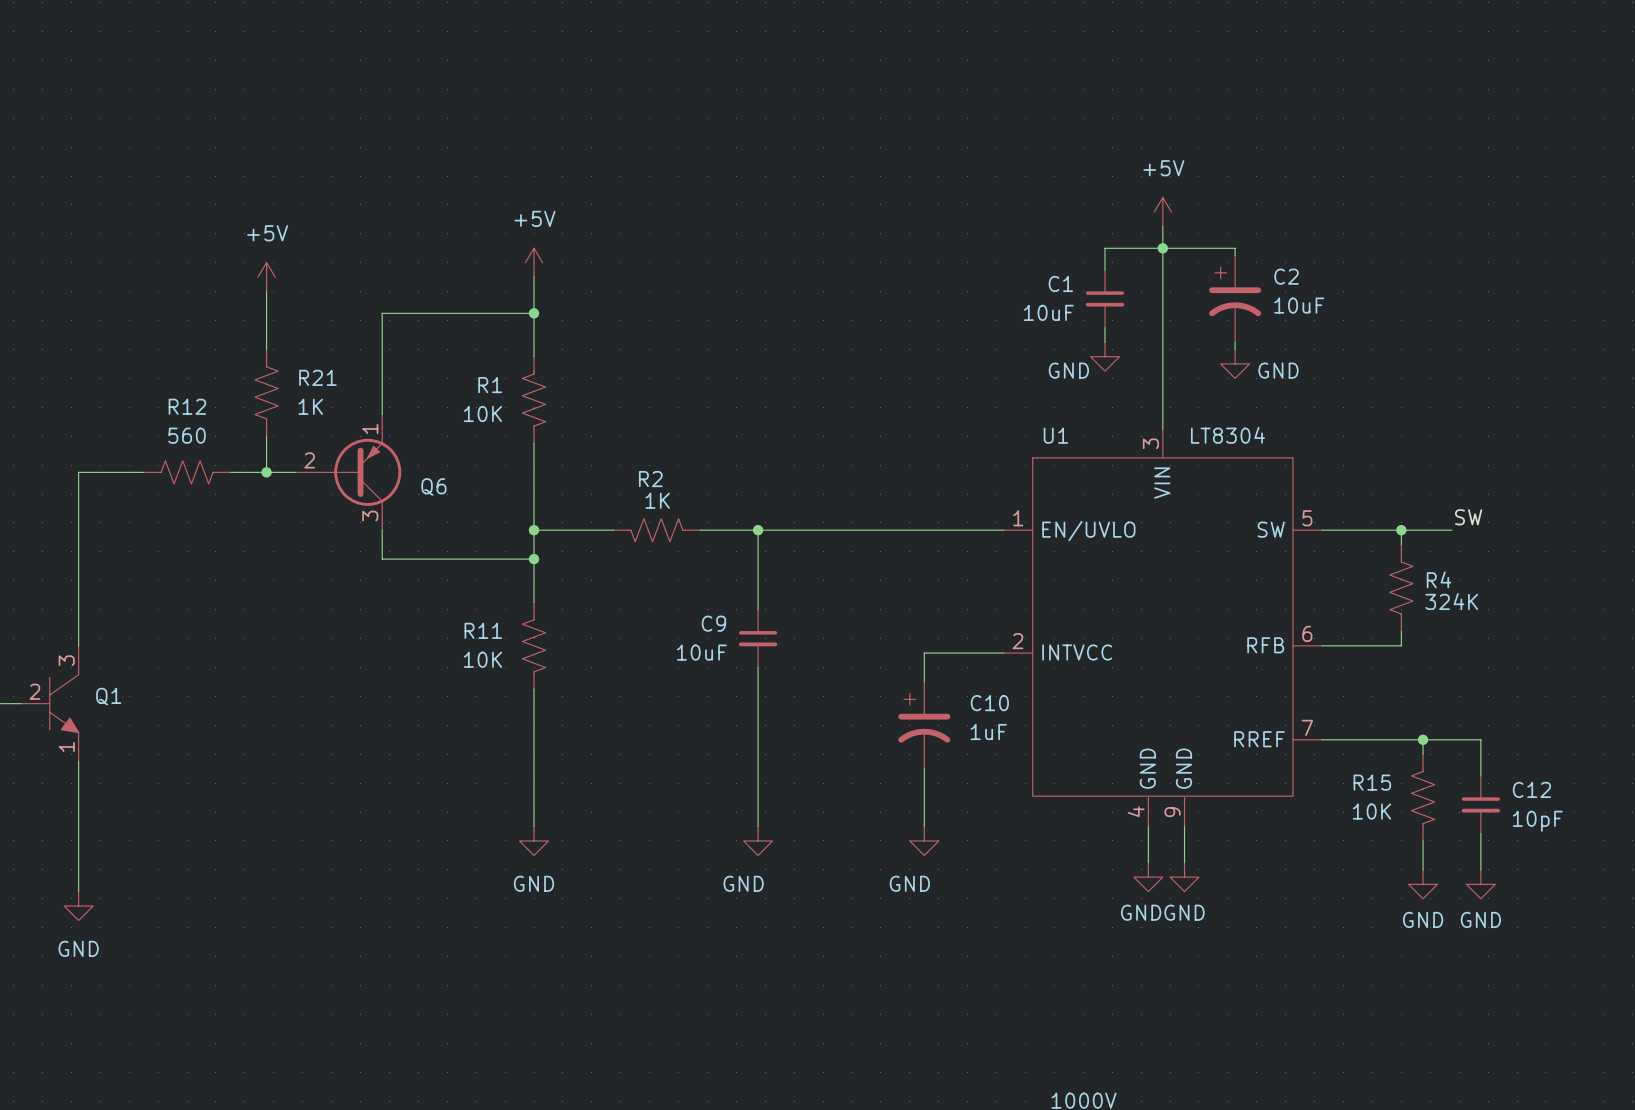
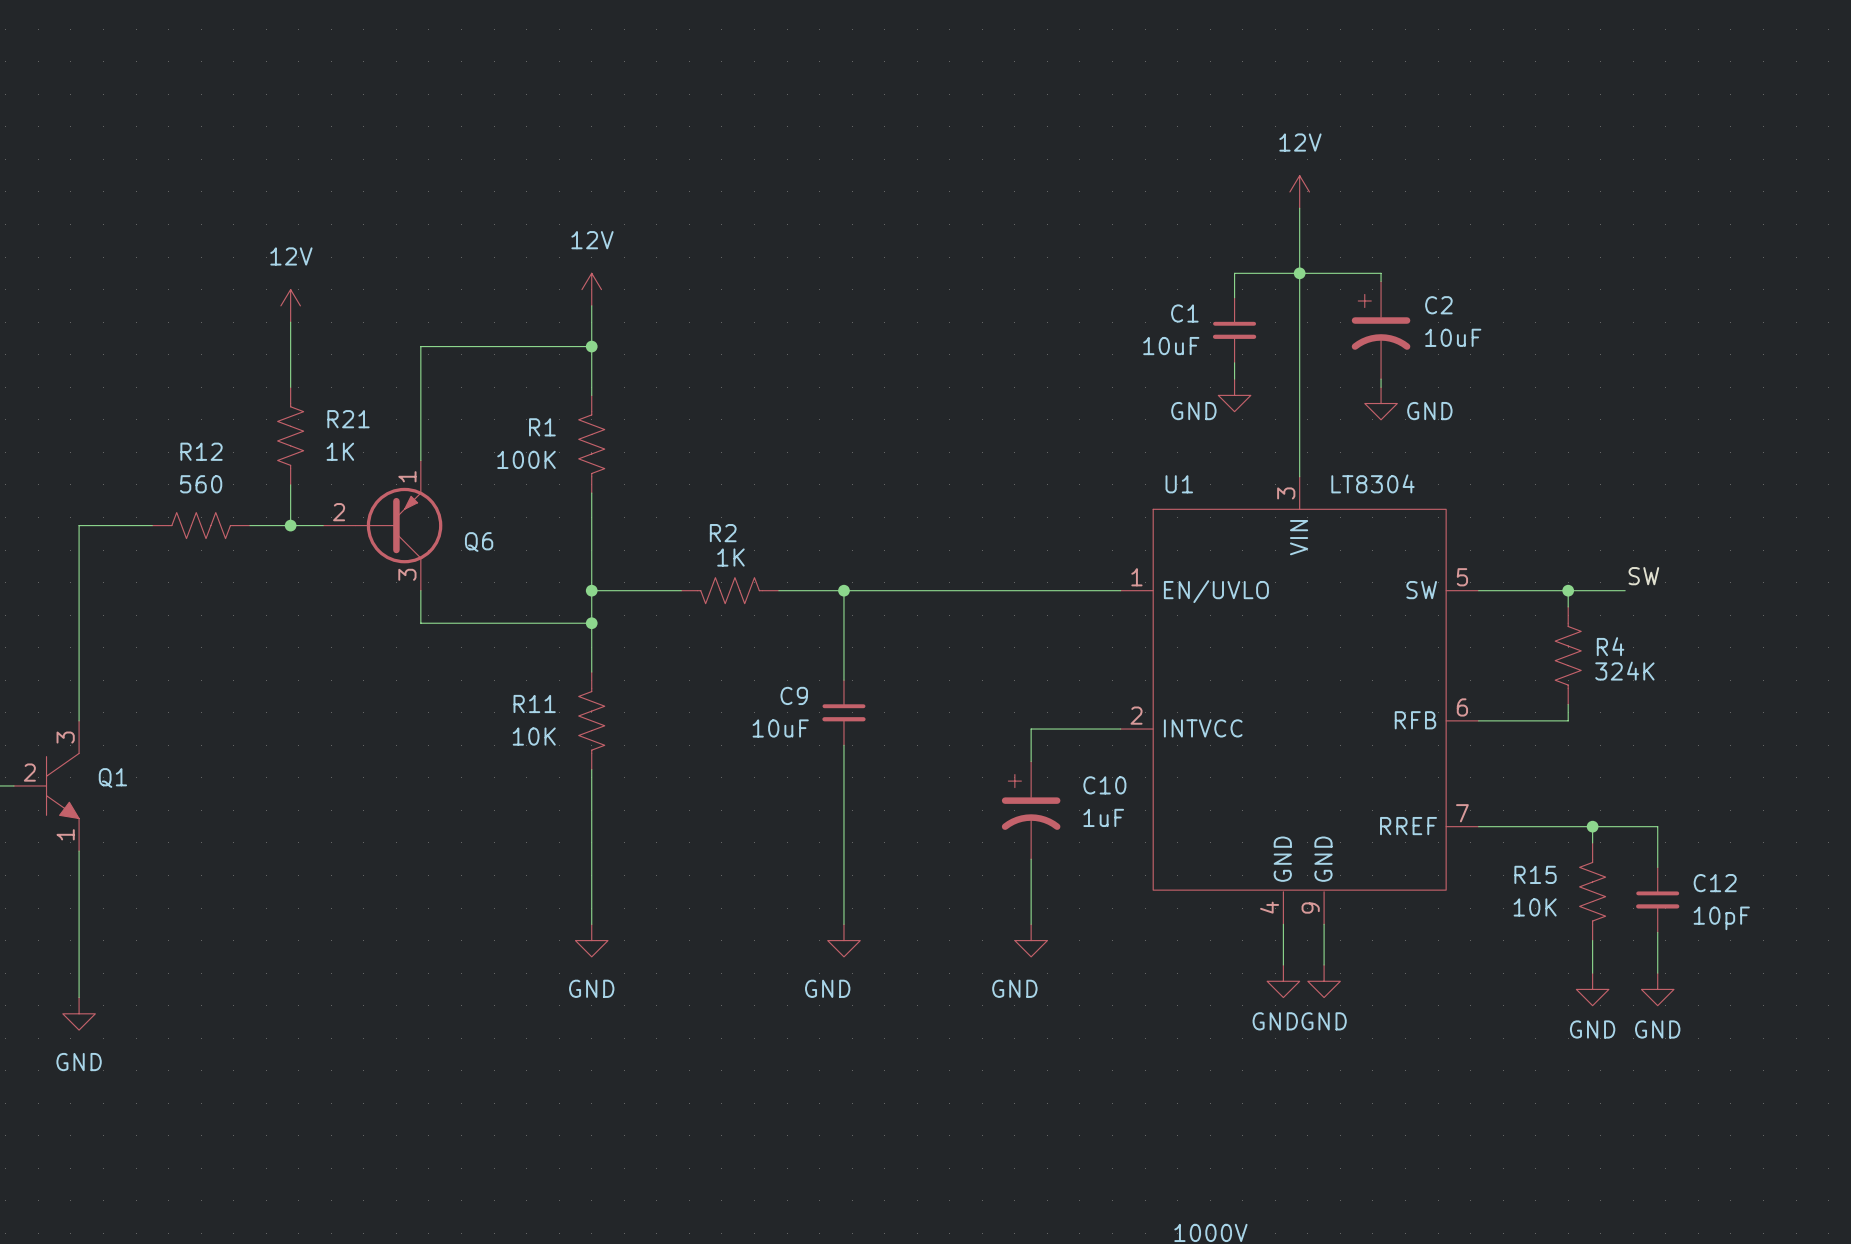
power symbol: none -> 12V (1299, 191)
power symbol: +5V (1162, 212) -> none
power symbol: +5V (534, 262) -> 12V (591, 289)
power symbol: +5V (266, 277) -> 12V (290, 305)
R1 value: 10K (482, 413) -> 100K (526, 459)

